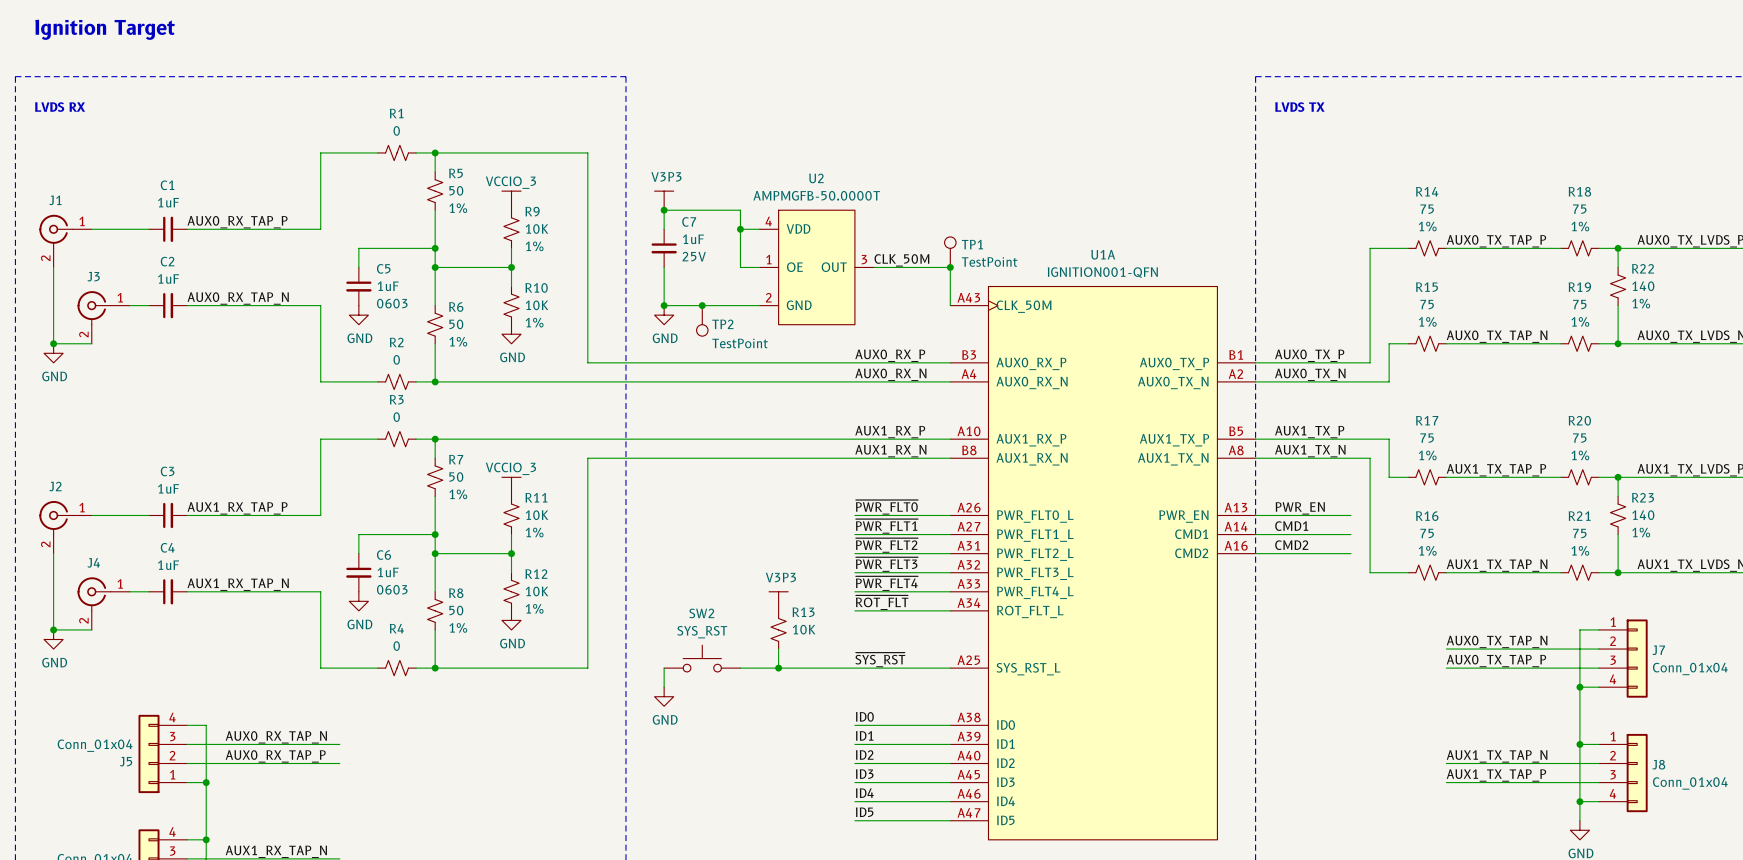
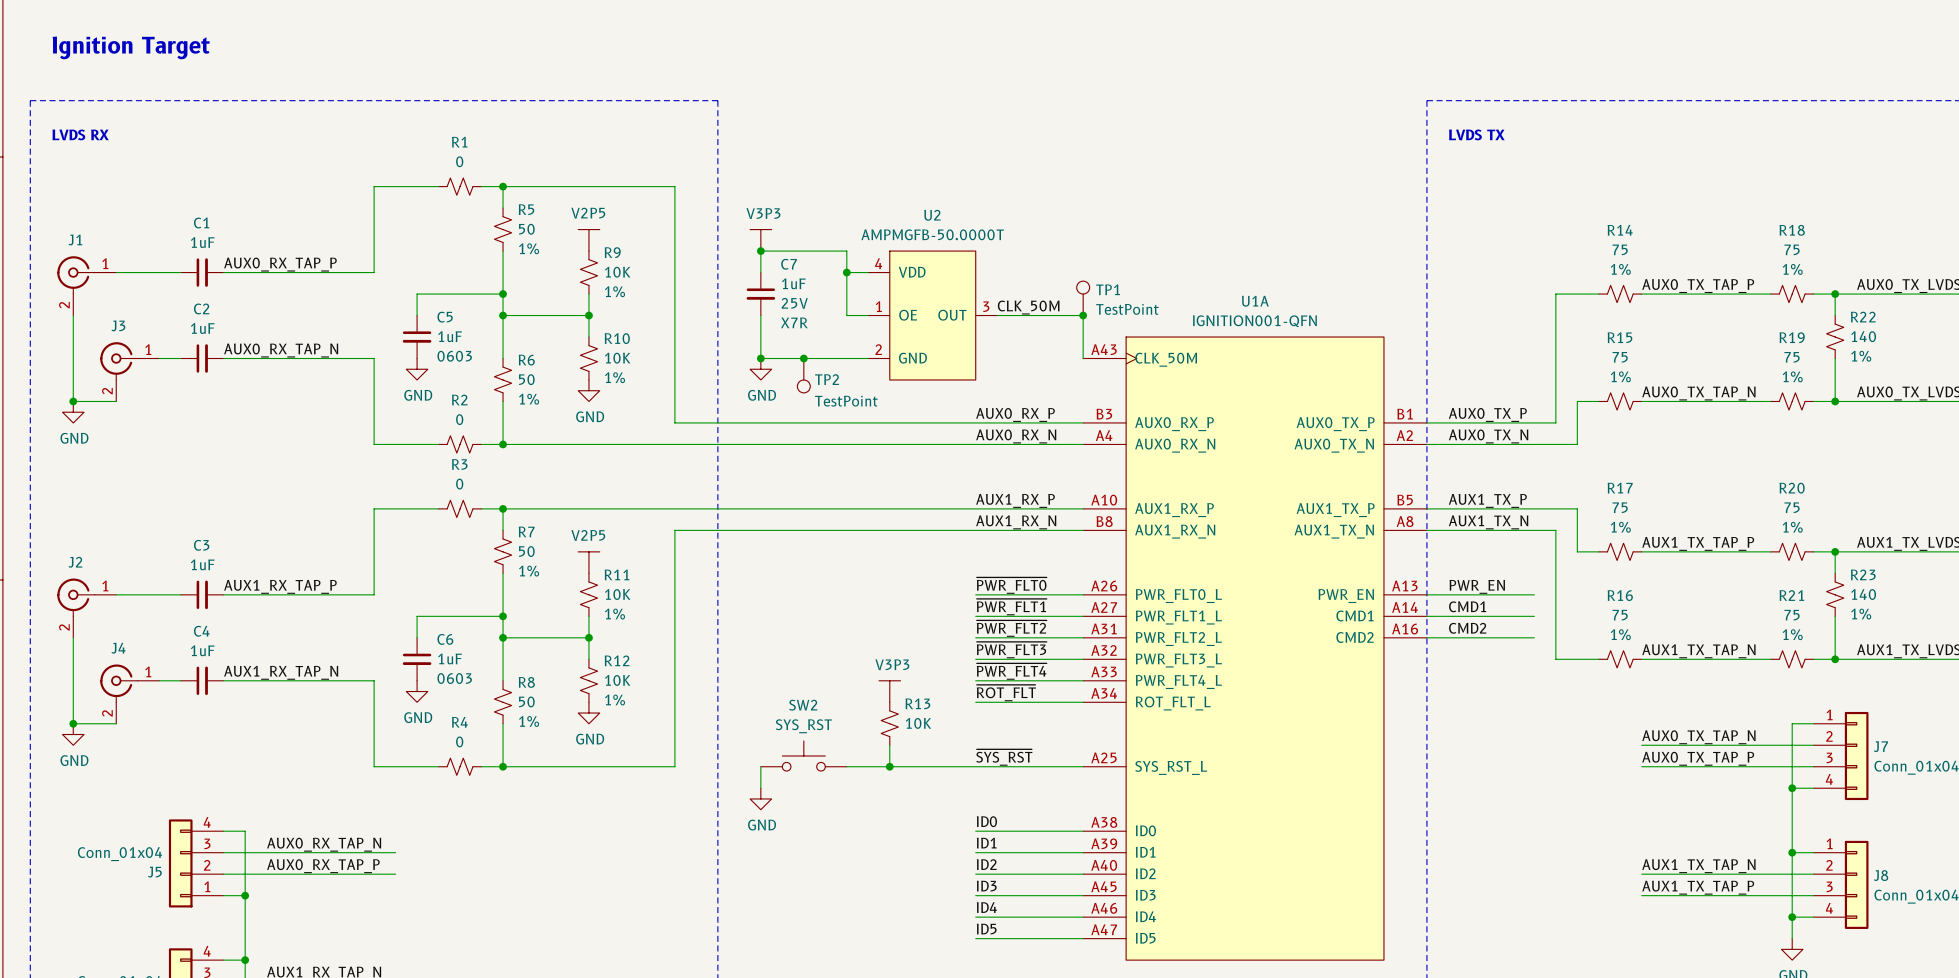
power symbol: VCCIO_3 (468, 191) -> V2P5 (540, 229)
C7 text: none -> X7R (794, 322)
power symbol: VCCIO_3 (468, 477) -> V2P5 (540, 551)

